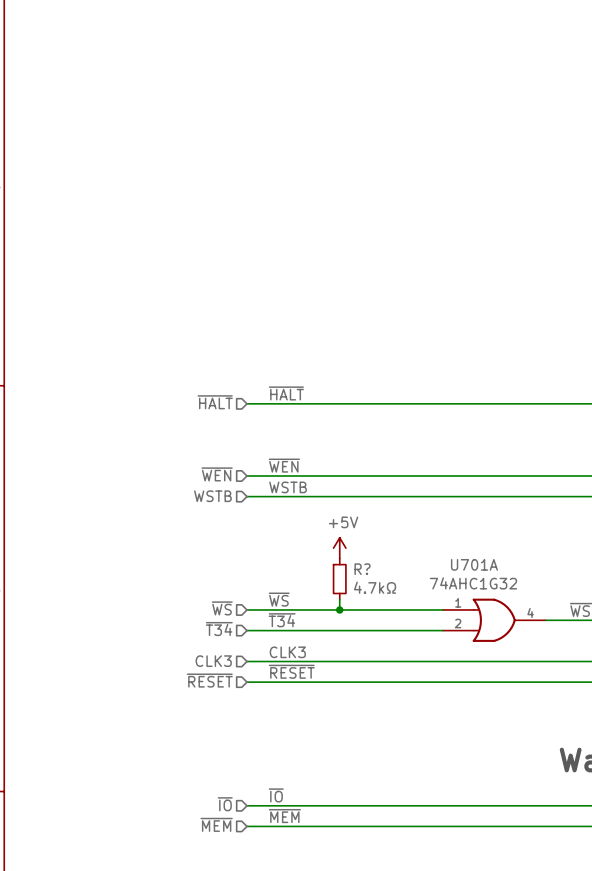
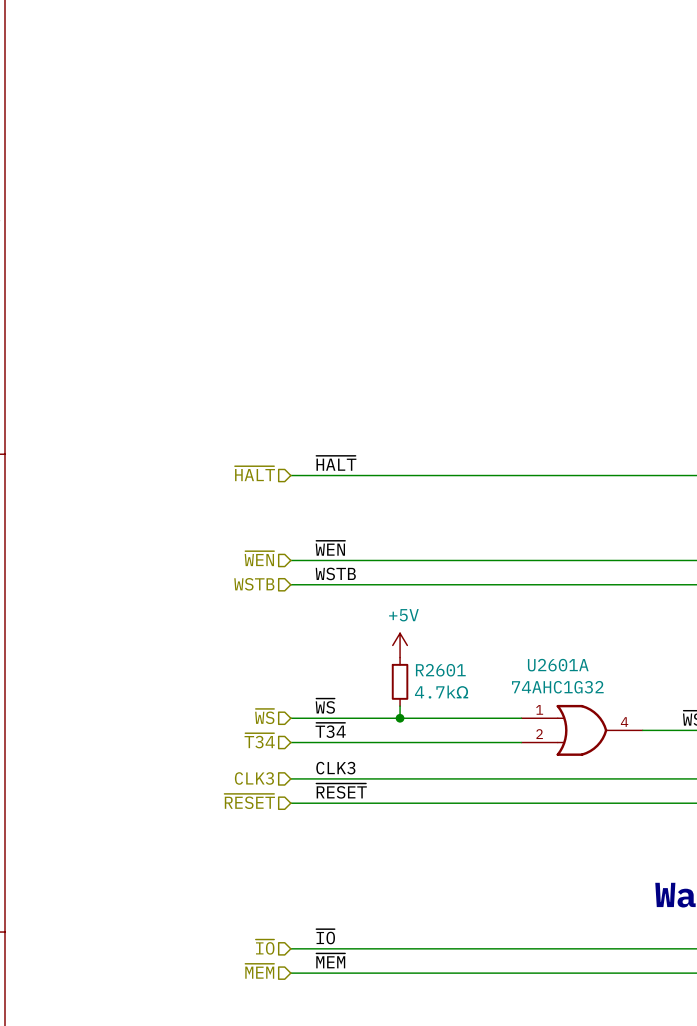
U701A name: U701A (474, 564) -> U2601A (558, 665)
R? name: R? (362, 569) -> R2601 (440, 670)

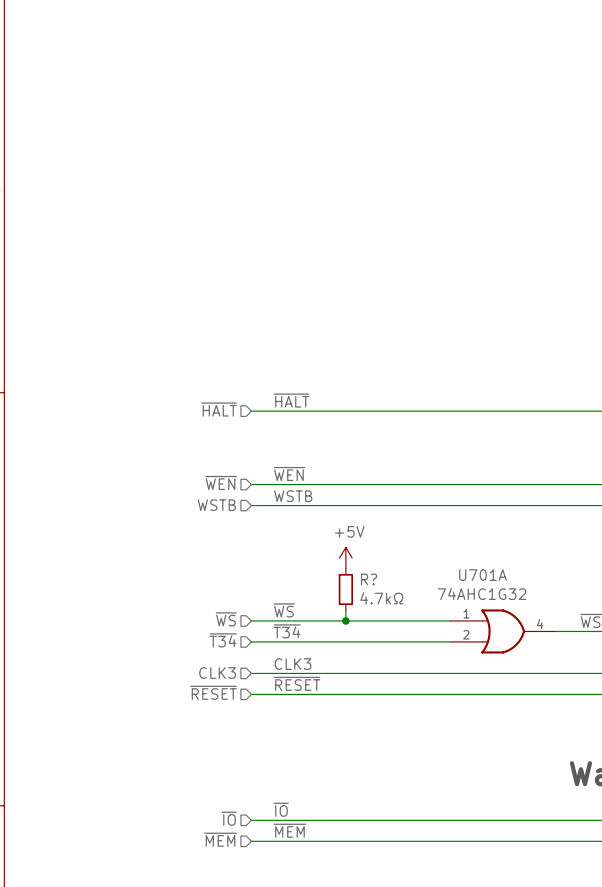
U2601A name: U2601A (558, 665) -> U701A (483, 575)
R2601 name: R2601 (440, 670) -> R? (369, 579)

